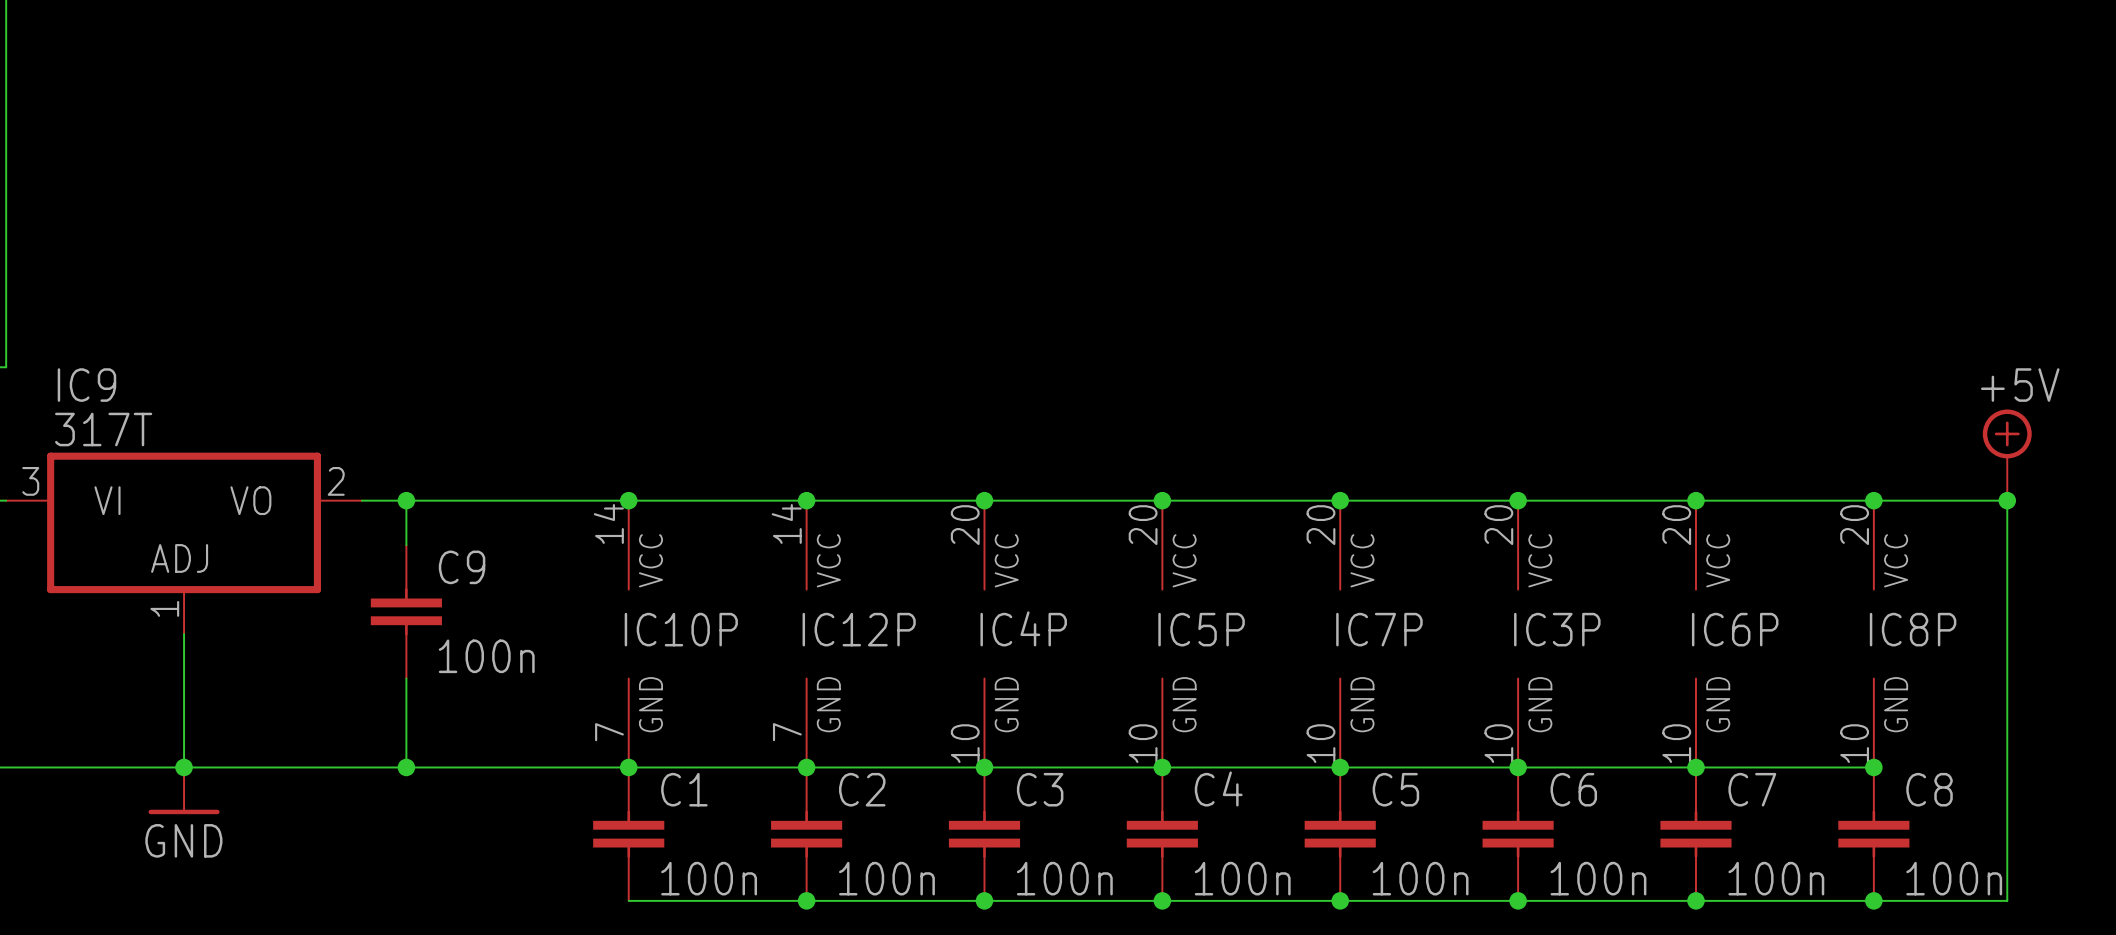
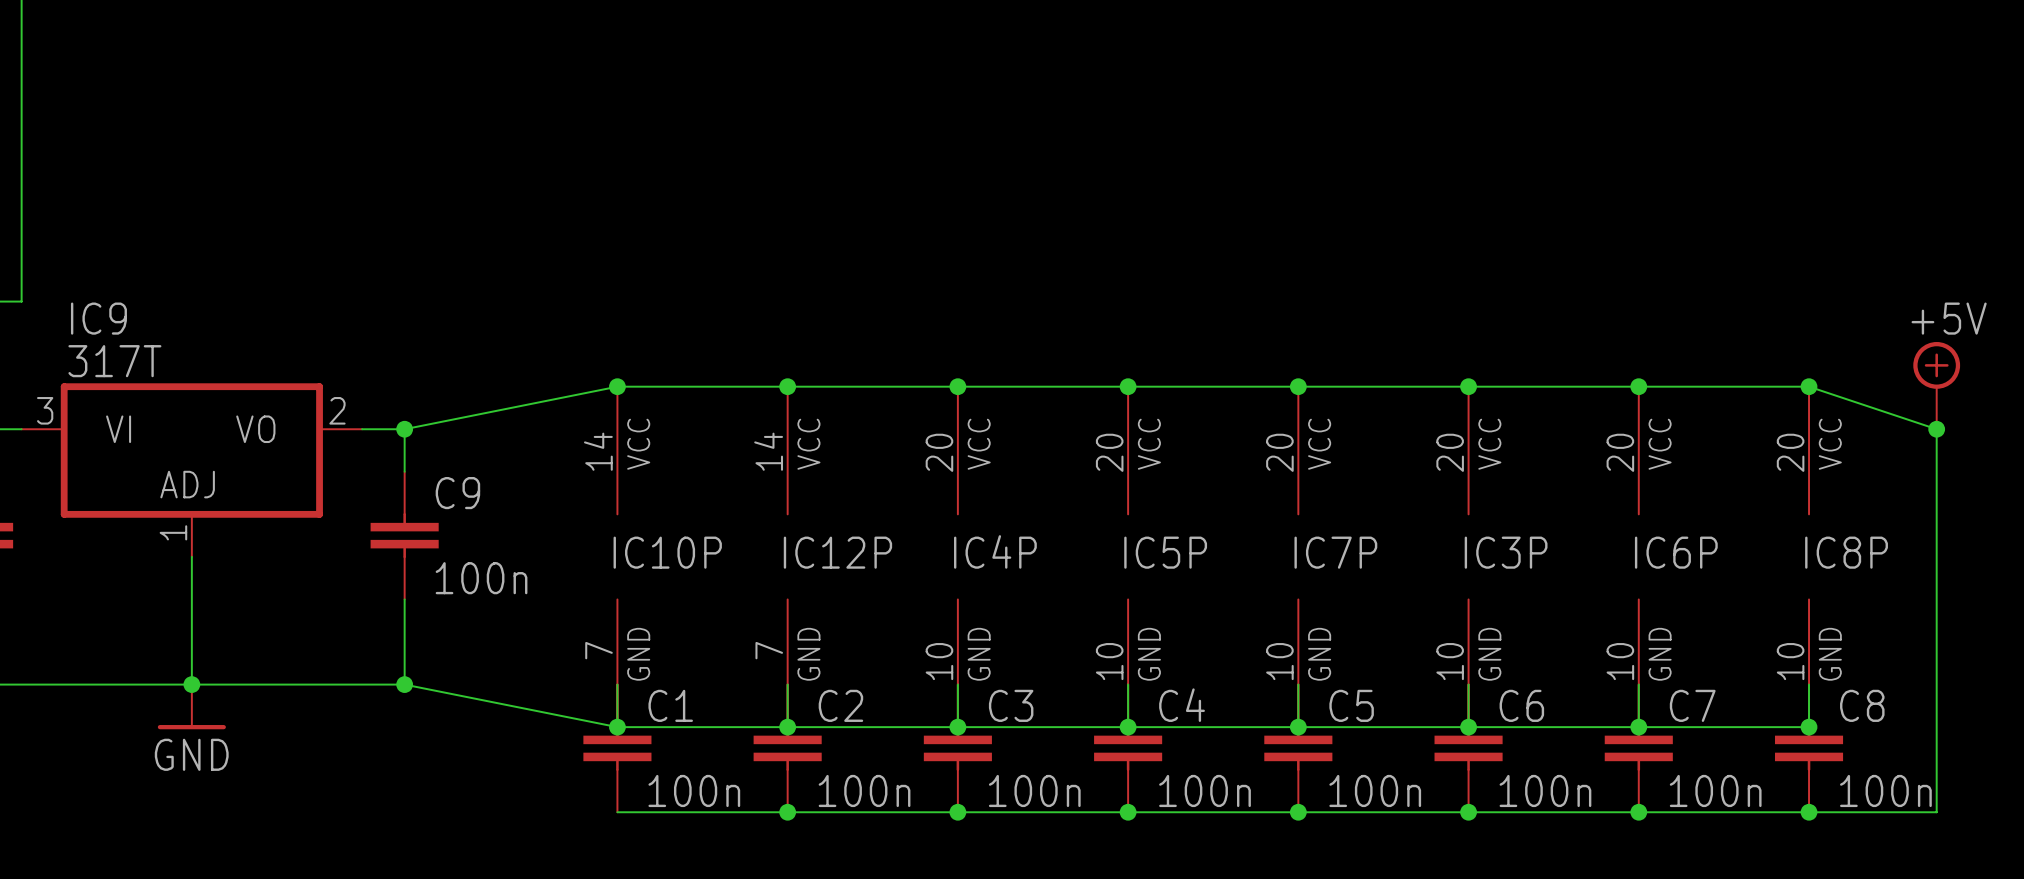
wire: (406, 500) (2007, 500) -> (404, 429) (617, 386) (1809, 386) (1936, 429)
IC10P symbol: [628, 500, 629, 768] -> [617, 386, 618, 728]
junction position: (628, 500) -> (617, 386)
IC12P symbol: [806, 500, 807, 768] -> [787, 386, 788, 728]
junction position: (806, 500) -> (787, 386)
IC4P symbol: [984, 500, 985, 768] -> [957, 386, 958, 728]
junction position: (984, 500) -> (957, 386)
IC5P symbol: [1162, 500, 1163, 768] -> [1128, 386, 1129, 728]
junction position: (1162, 500) -> (1128, 386)
IC7P symbol: [1340, 500, 1341, 768] -> [1298, 386, 1299, 728]
junction position: (1340, 500) -> (1298, 386)
IC3P symbol: [1518, 500, 1519, 768] -> [1468, 386, 1469, 728]
junction position: (1518, 500) -> (1468, 386)
IC6P symbol: [1695, 500, 1696, 768] -> [1638, 386, 1639, 728]
junction position: (1695, 500) -> (1638, 386)
IC8P symbol: [1873, 500, 1874, 768] -> [1809, 386, 1810, 728]
junction position: (1873, 500) -> (1809, 386)
wire: (406, 767) (1873, 767) -> (617, 727) (1809, 727) (1809, 684)
wire: none -> (404, 684) (617, 727)
junction position: (628, 767) -> (617, 727)
junction position: (806, 767) -> (787, 727)
junction position: (984, 767) -> (957, 727)
junction position: (1162, 767) -> (1128, 727)
junction position: (1340, 767) -> (1298, 727)
junction position: (1518, 767) -> (1468, 727)
junction position: (1695, 767) -> (1638, 727)
junction position: (1873, 767) -> (1809, 727)

